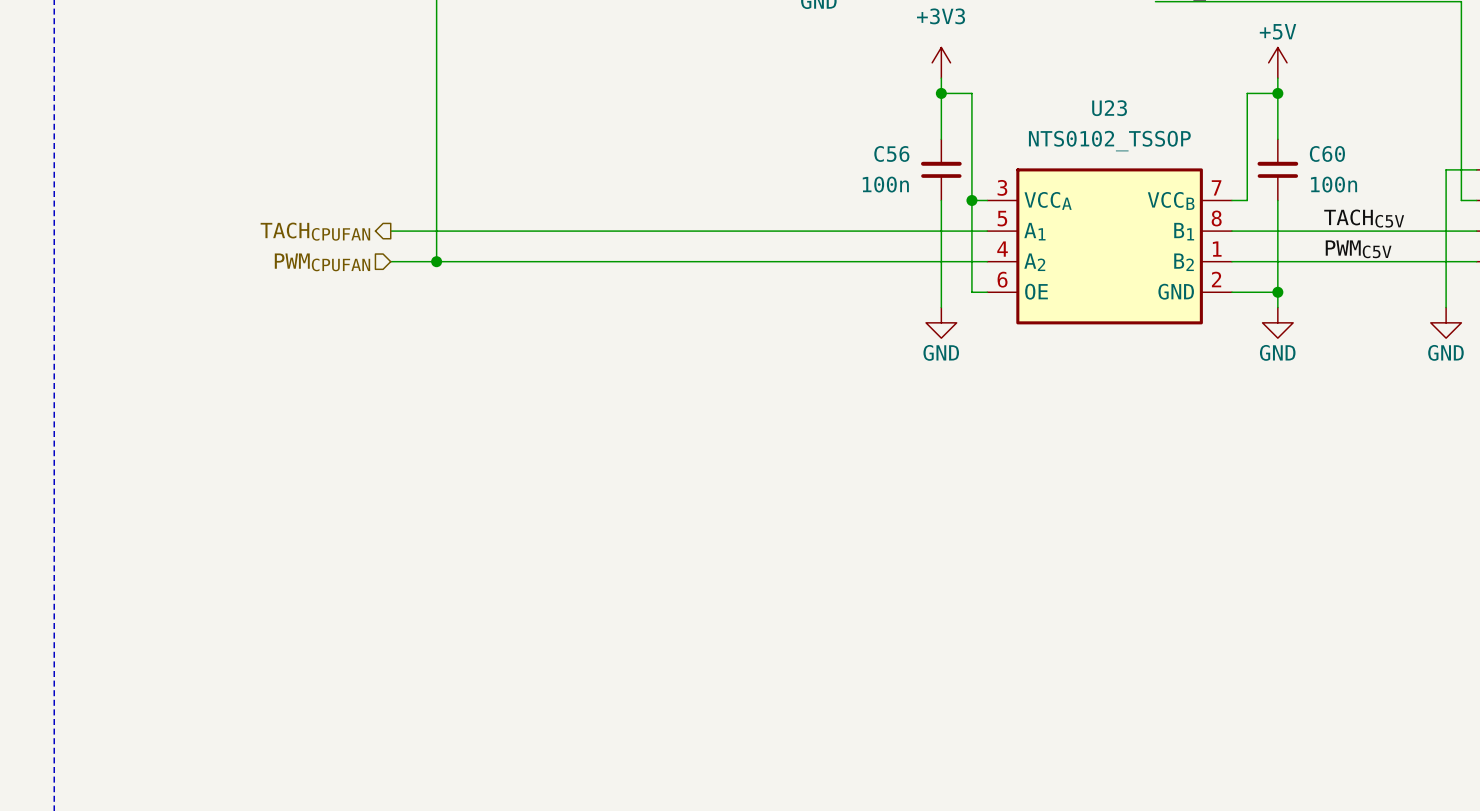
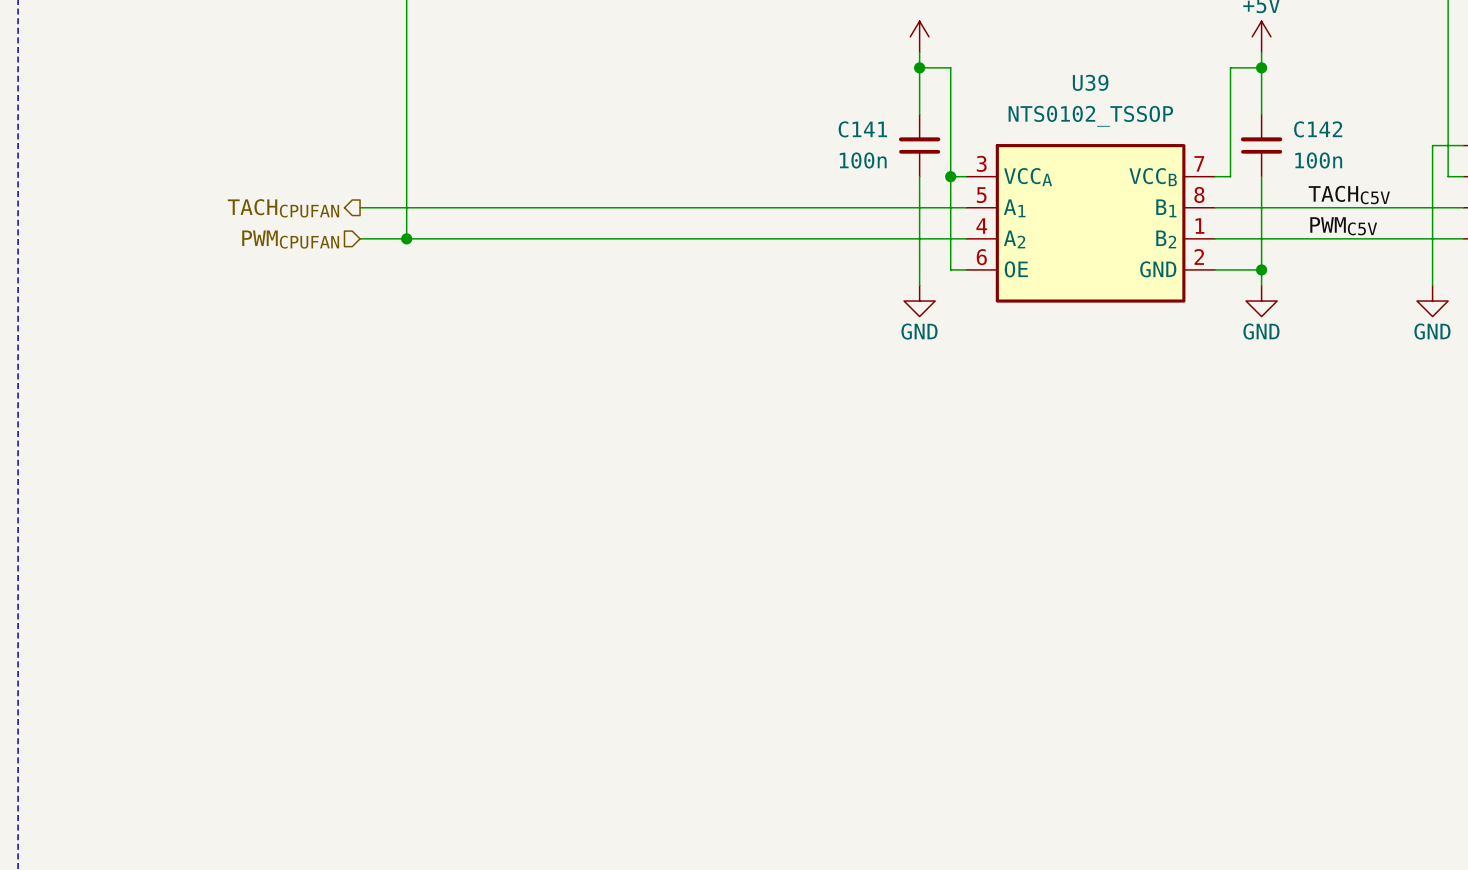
U23 name: U23 (1109, 108) -> U39 (1090, 82)
C56 name: C56 (891, 153) -> C141 (862, 129)
C60 name: C60 (1327, 153) -> C142 (1318, 129)

